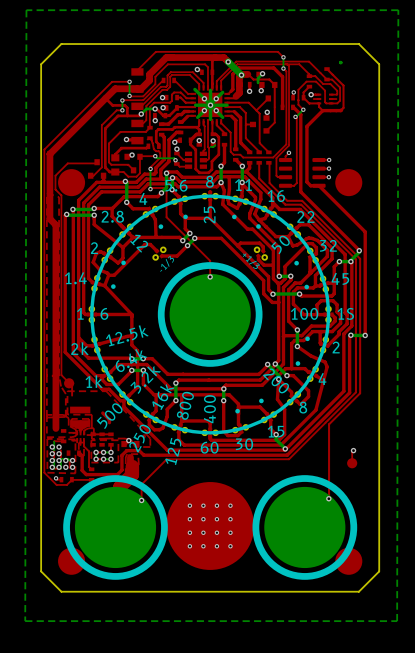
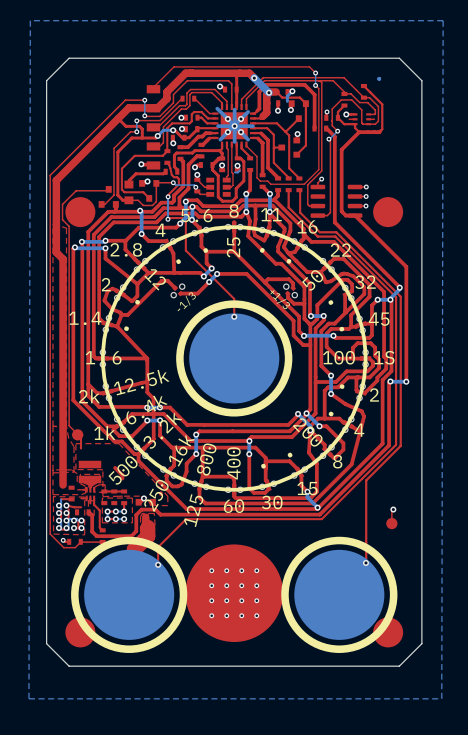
top track: none -> (66, 505) (81, 507)

